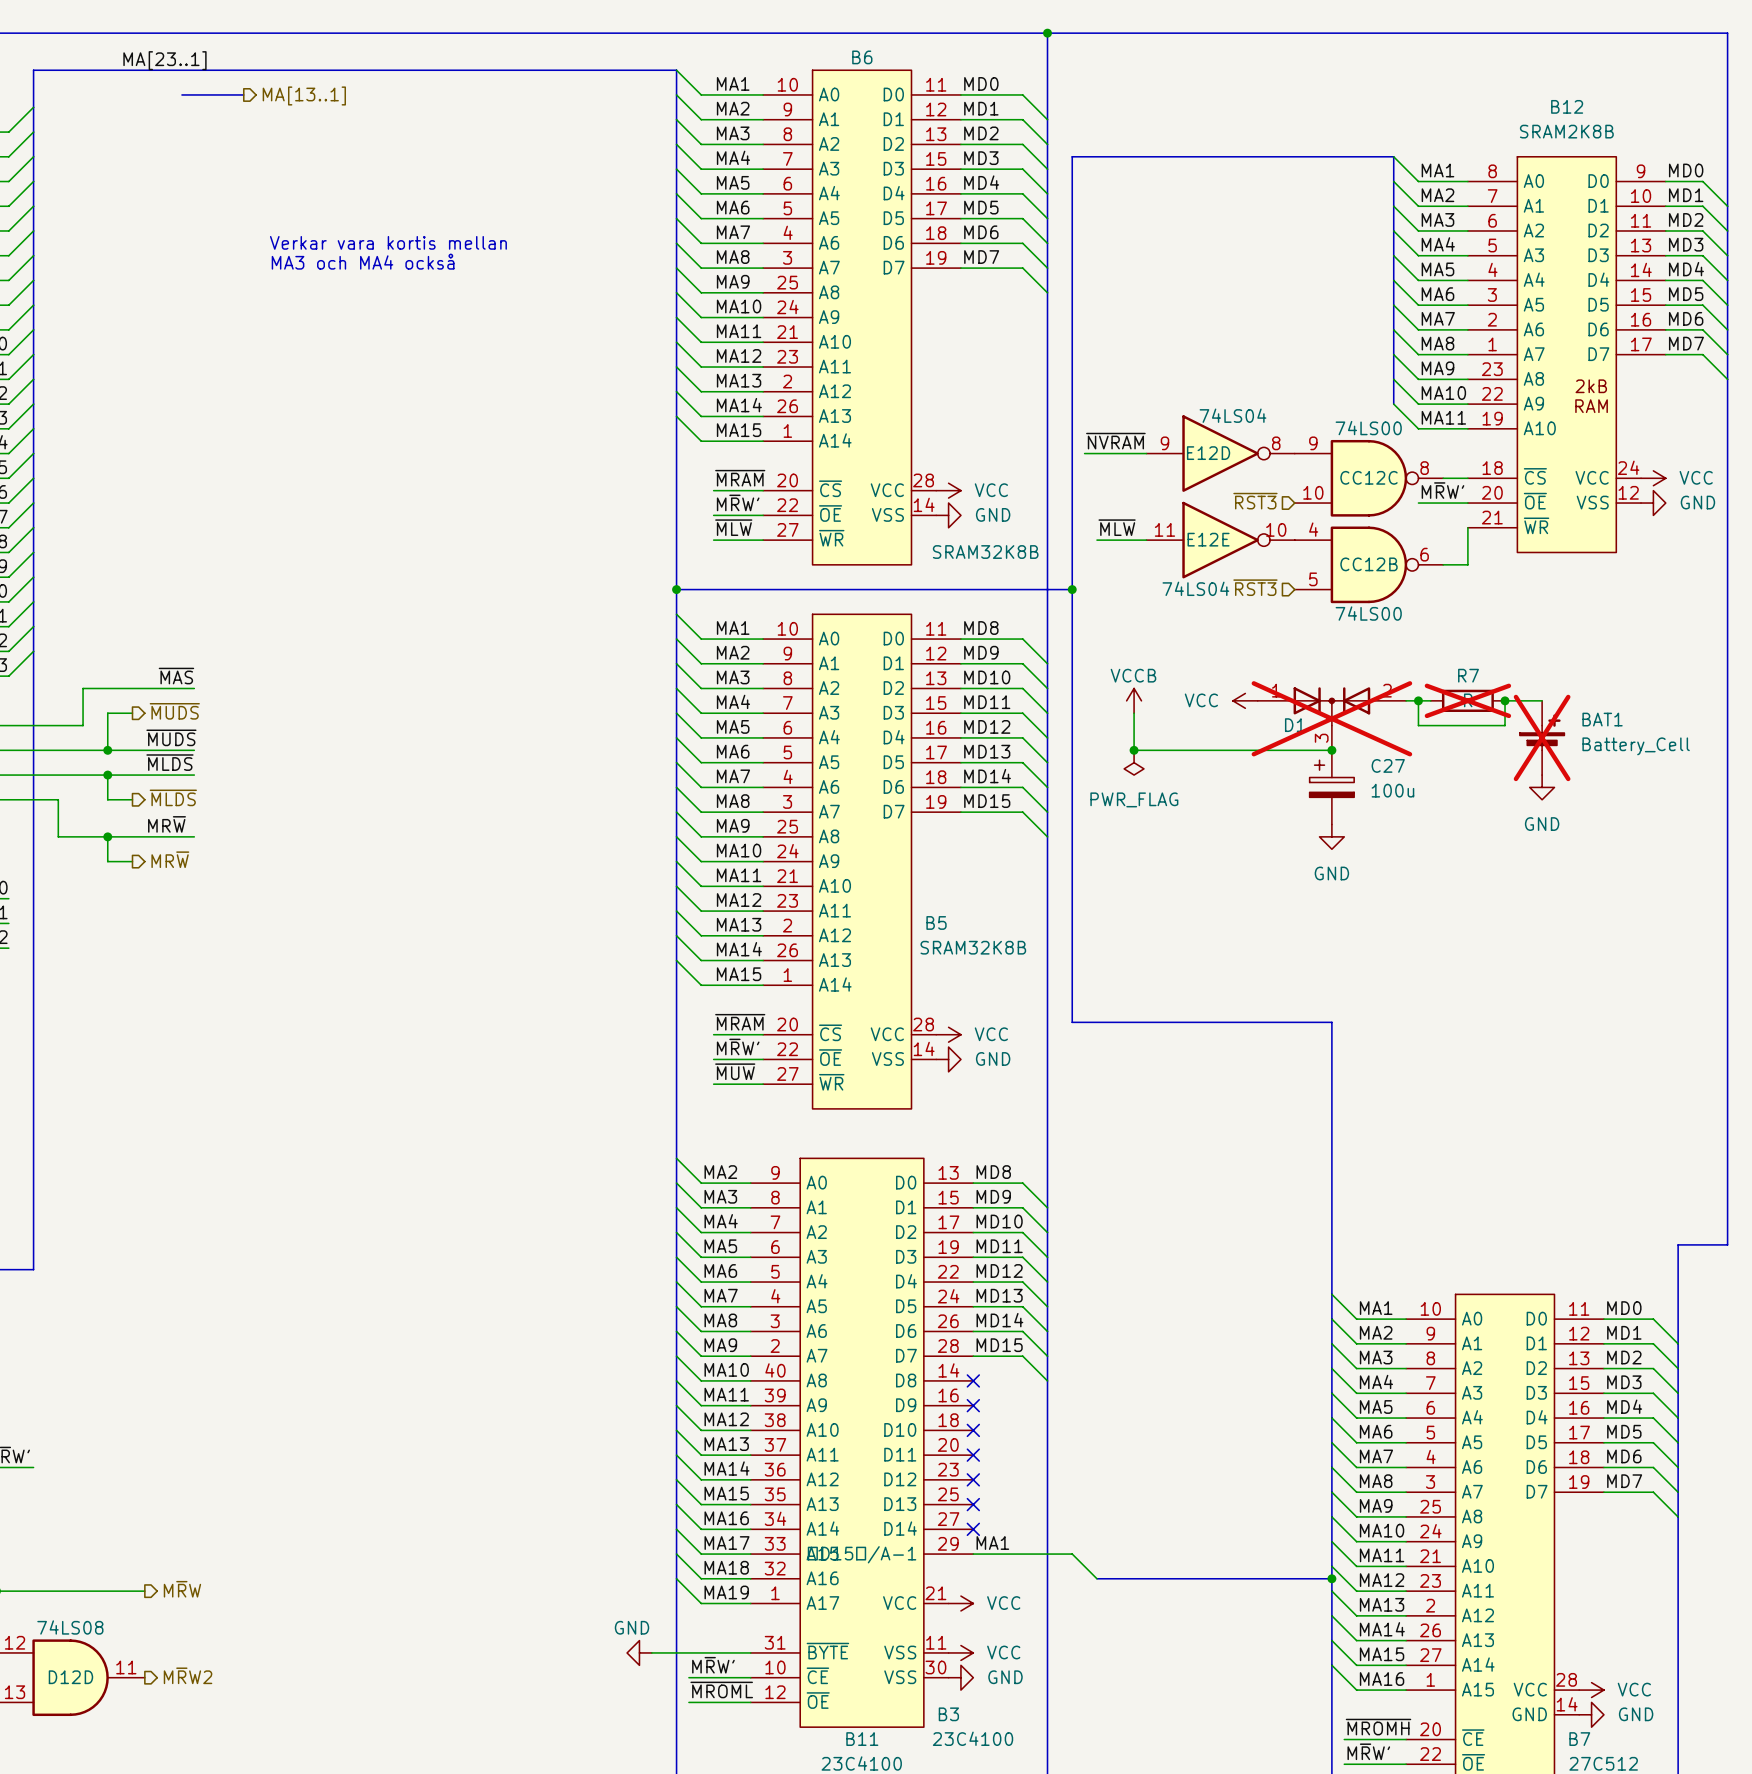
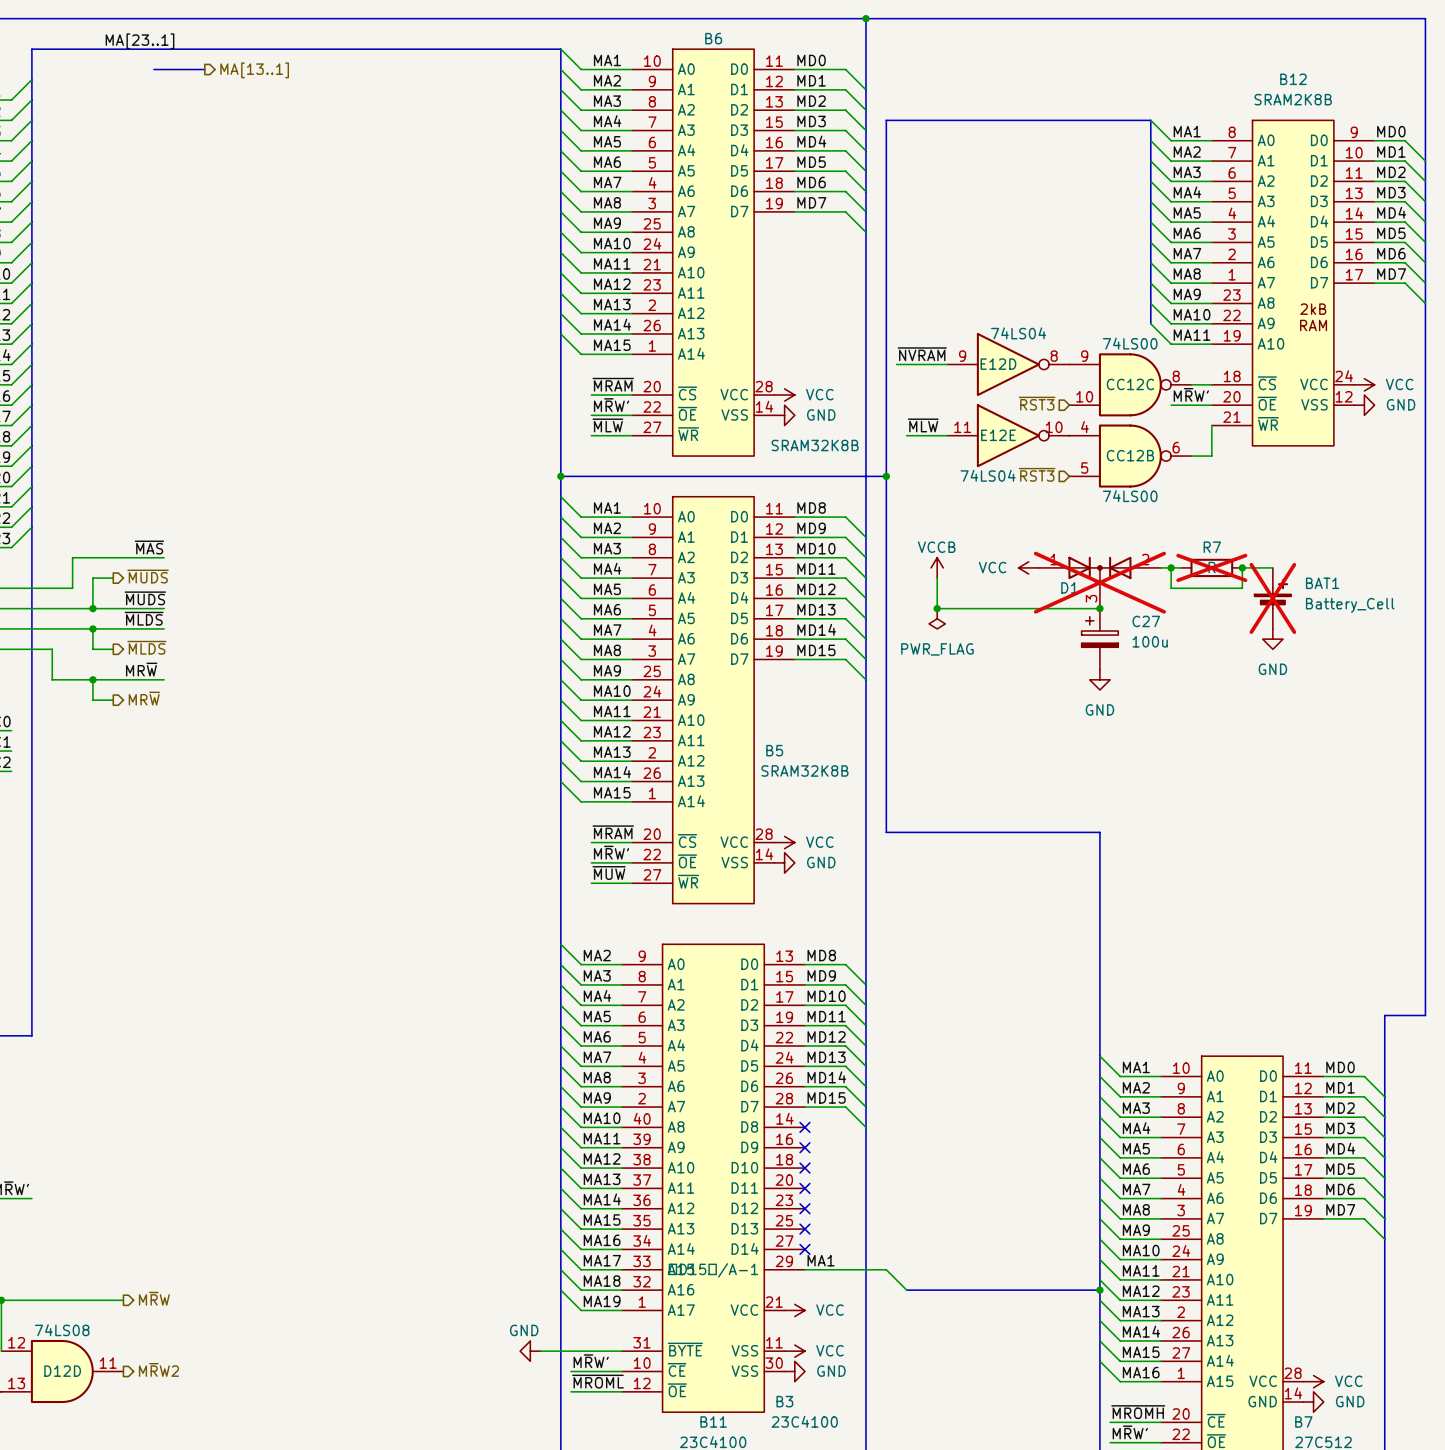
text: Verkar vara kortis mellan (388, 242) -> none
text: MA3 och MA4 också (363, 261) -> none

